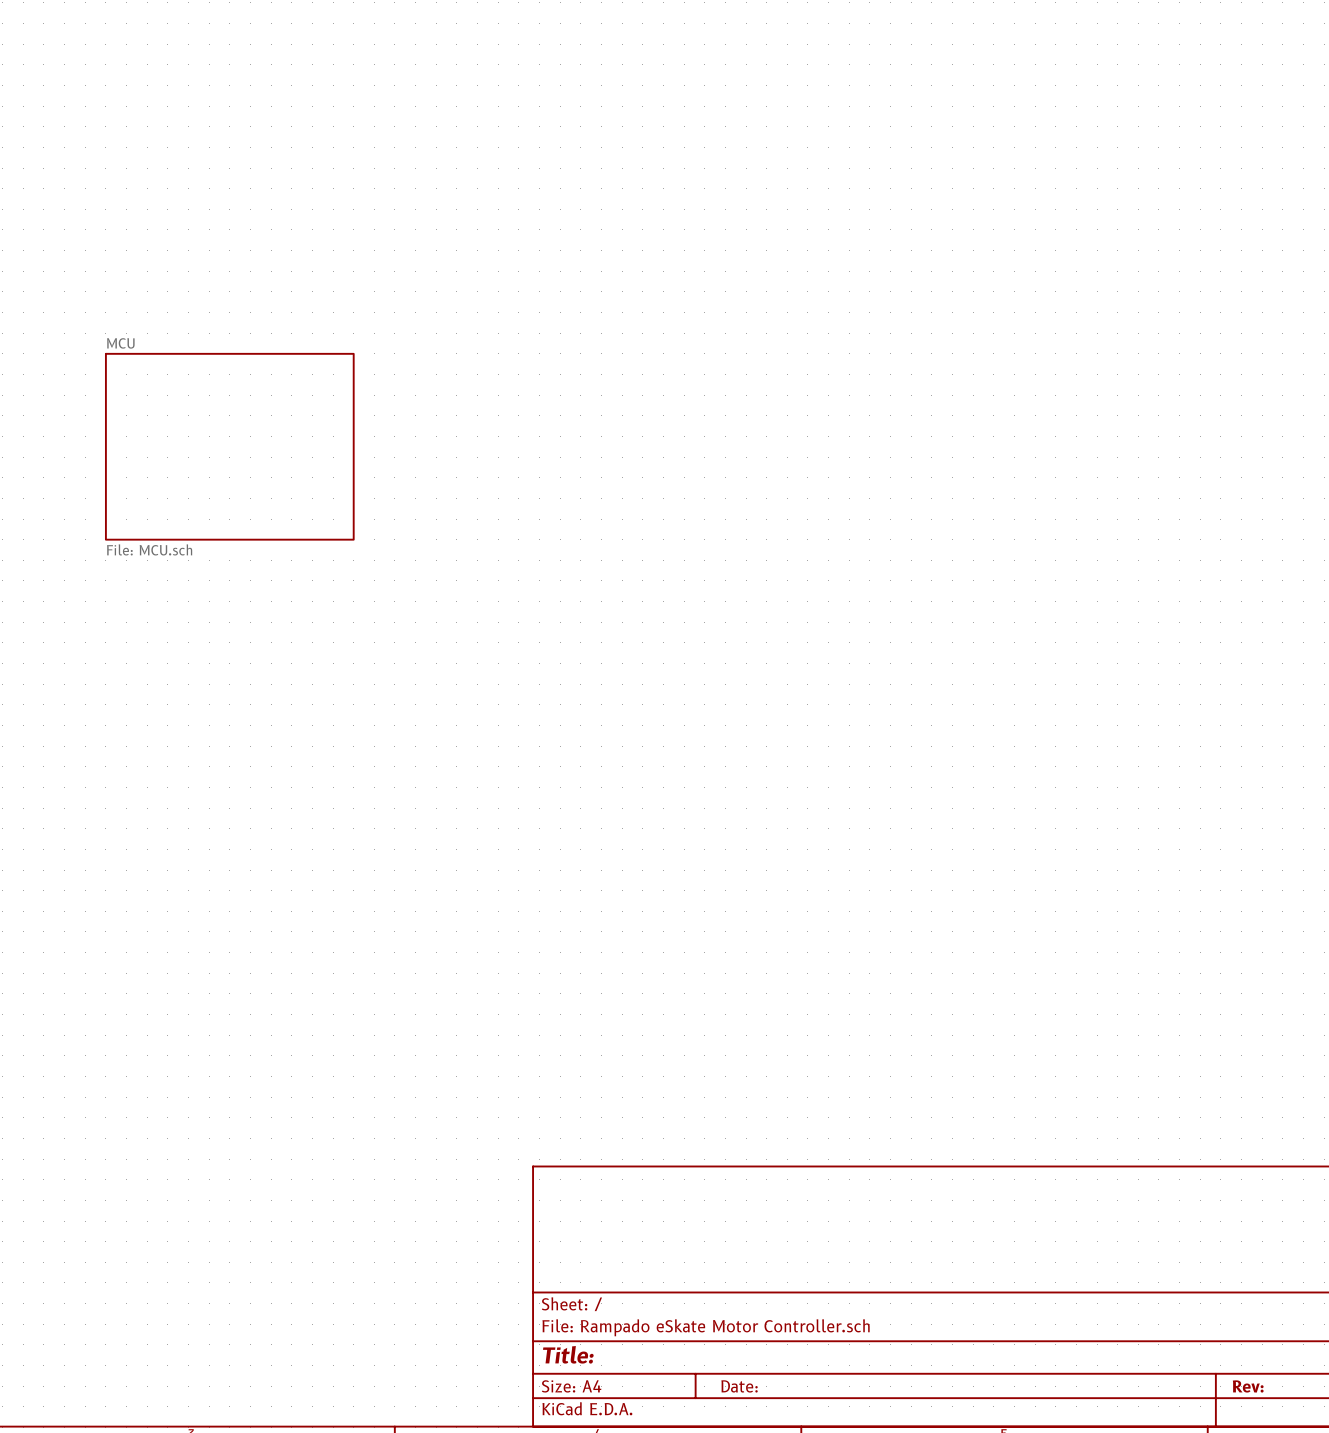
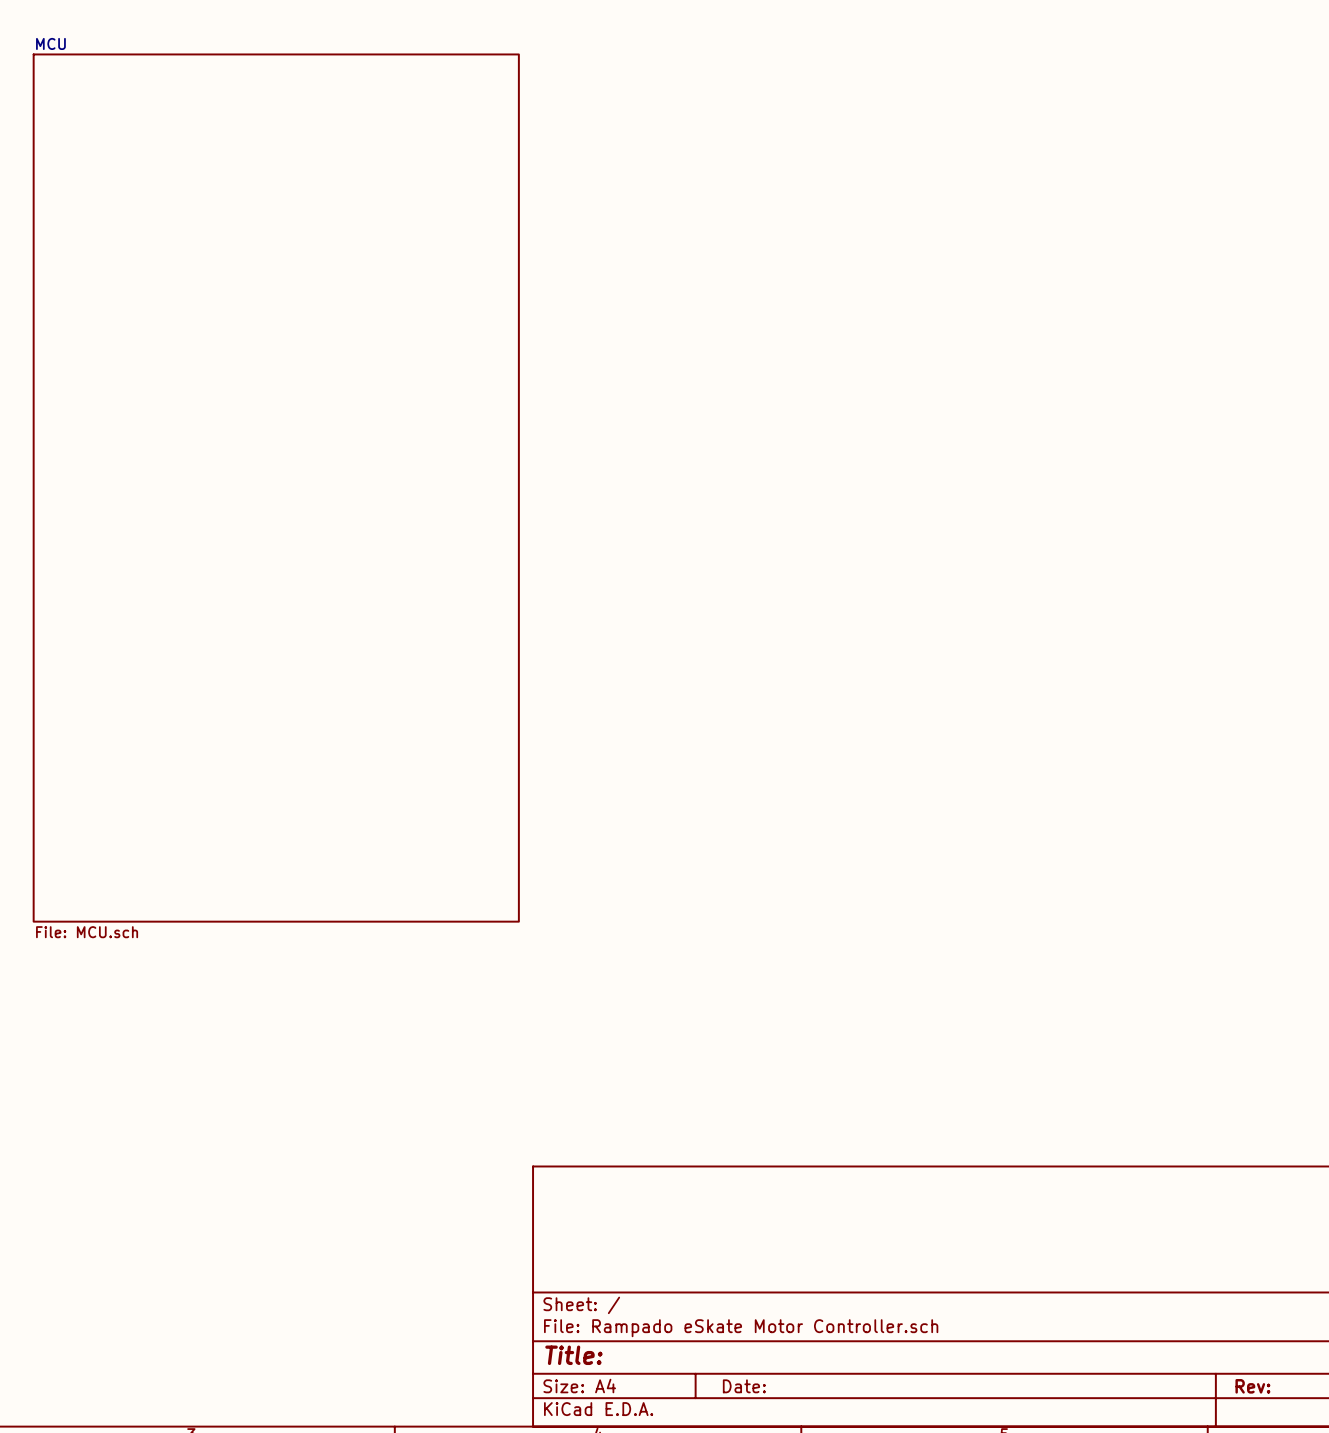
sheet MCU: File: MCU.sch (229, 446) -> none
sheet MCU: none -> File: MCU.sch (276, 488)

